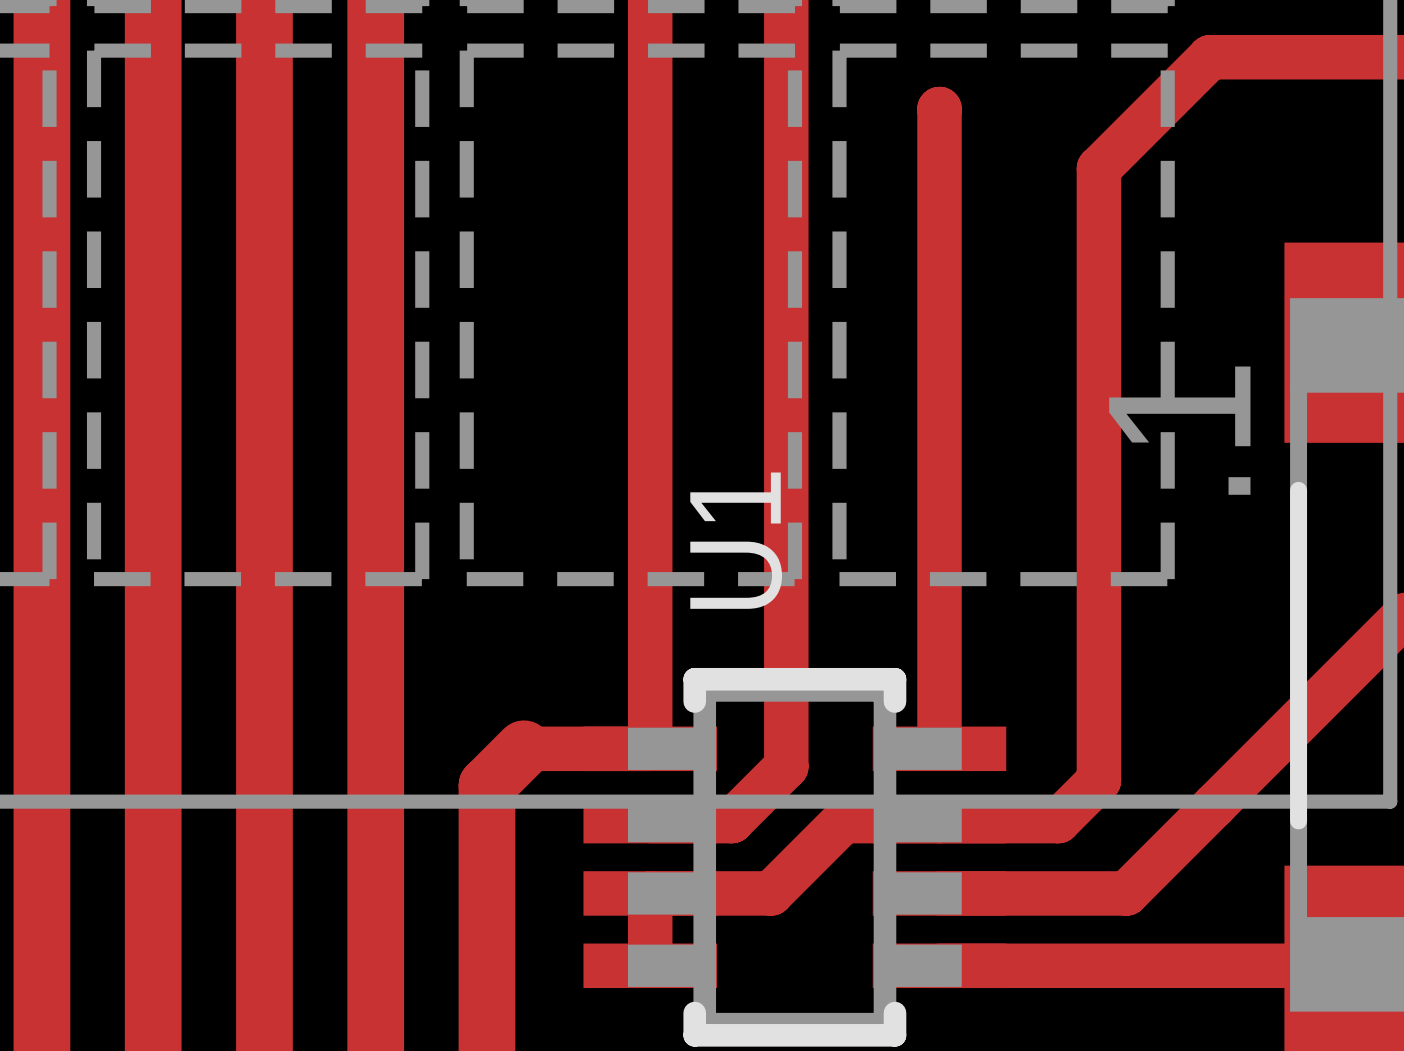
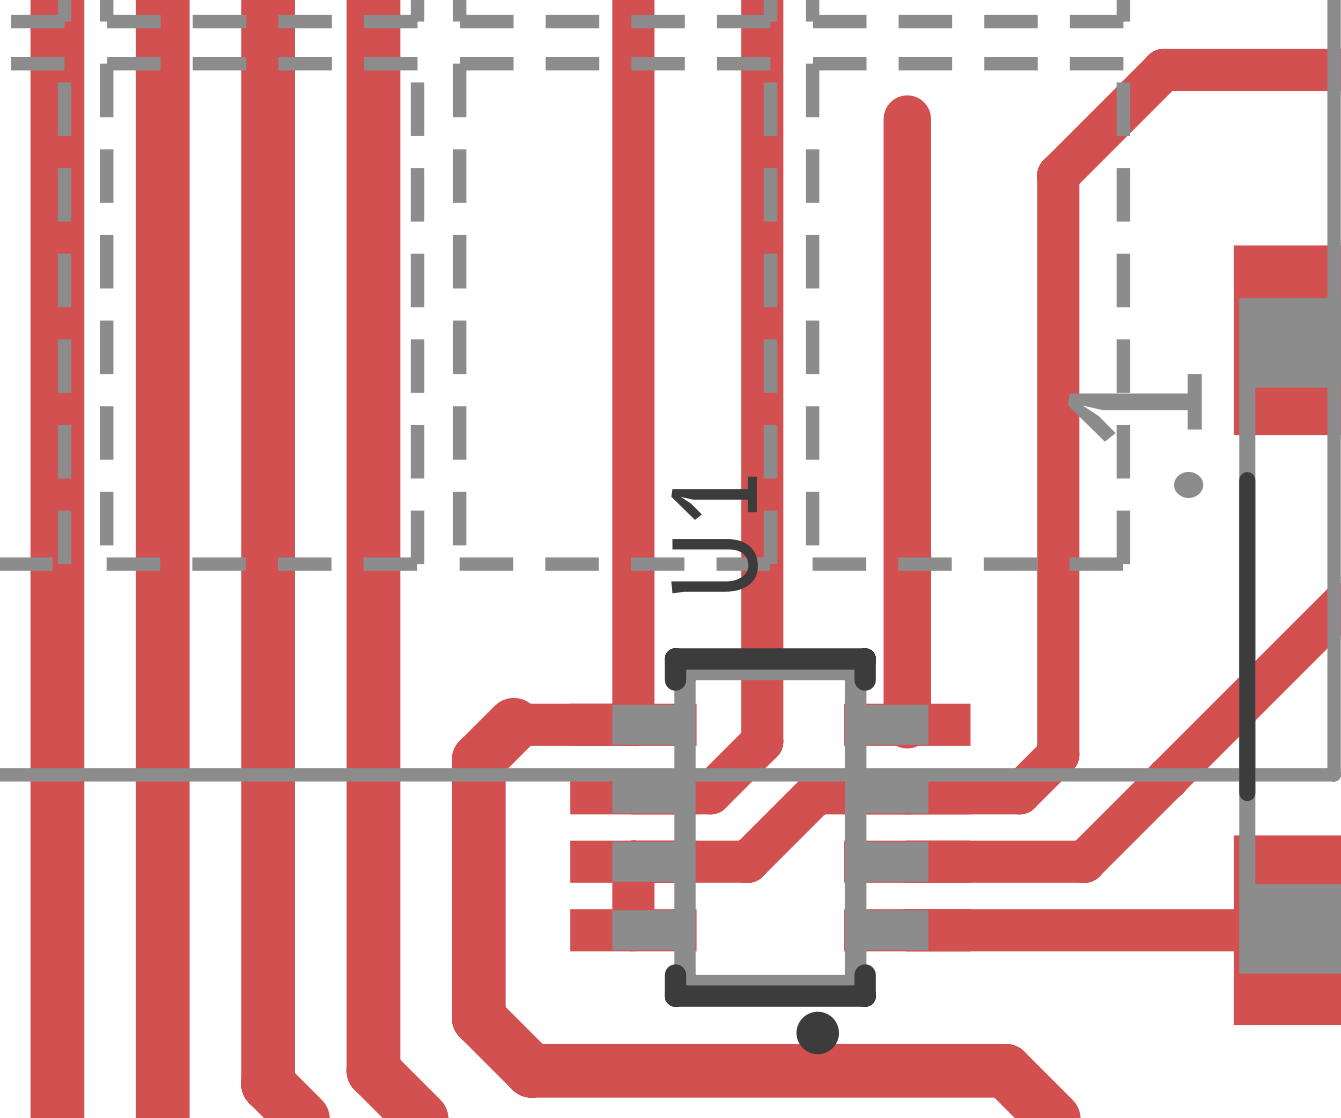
track width: thin (939, 109) (939, 748) -> thick (907, 119) (907, 724)

